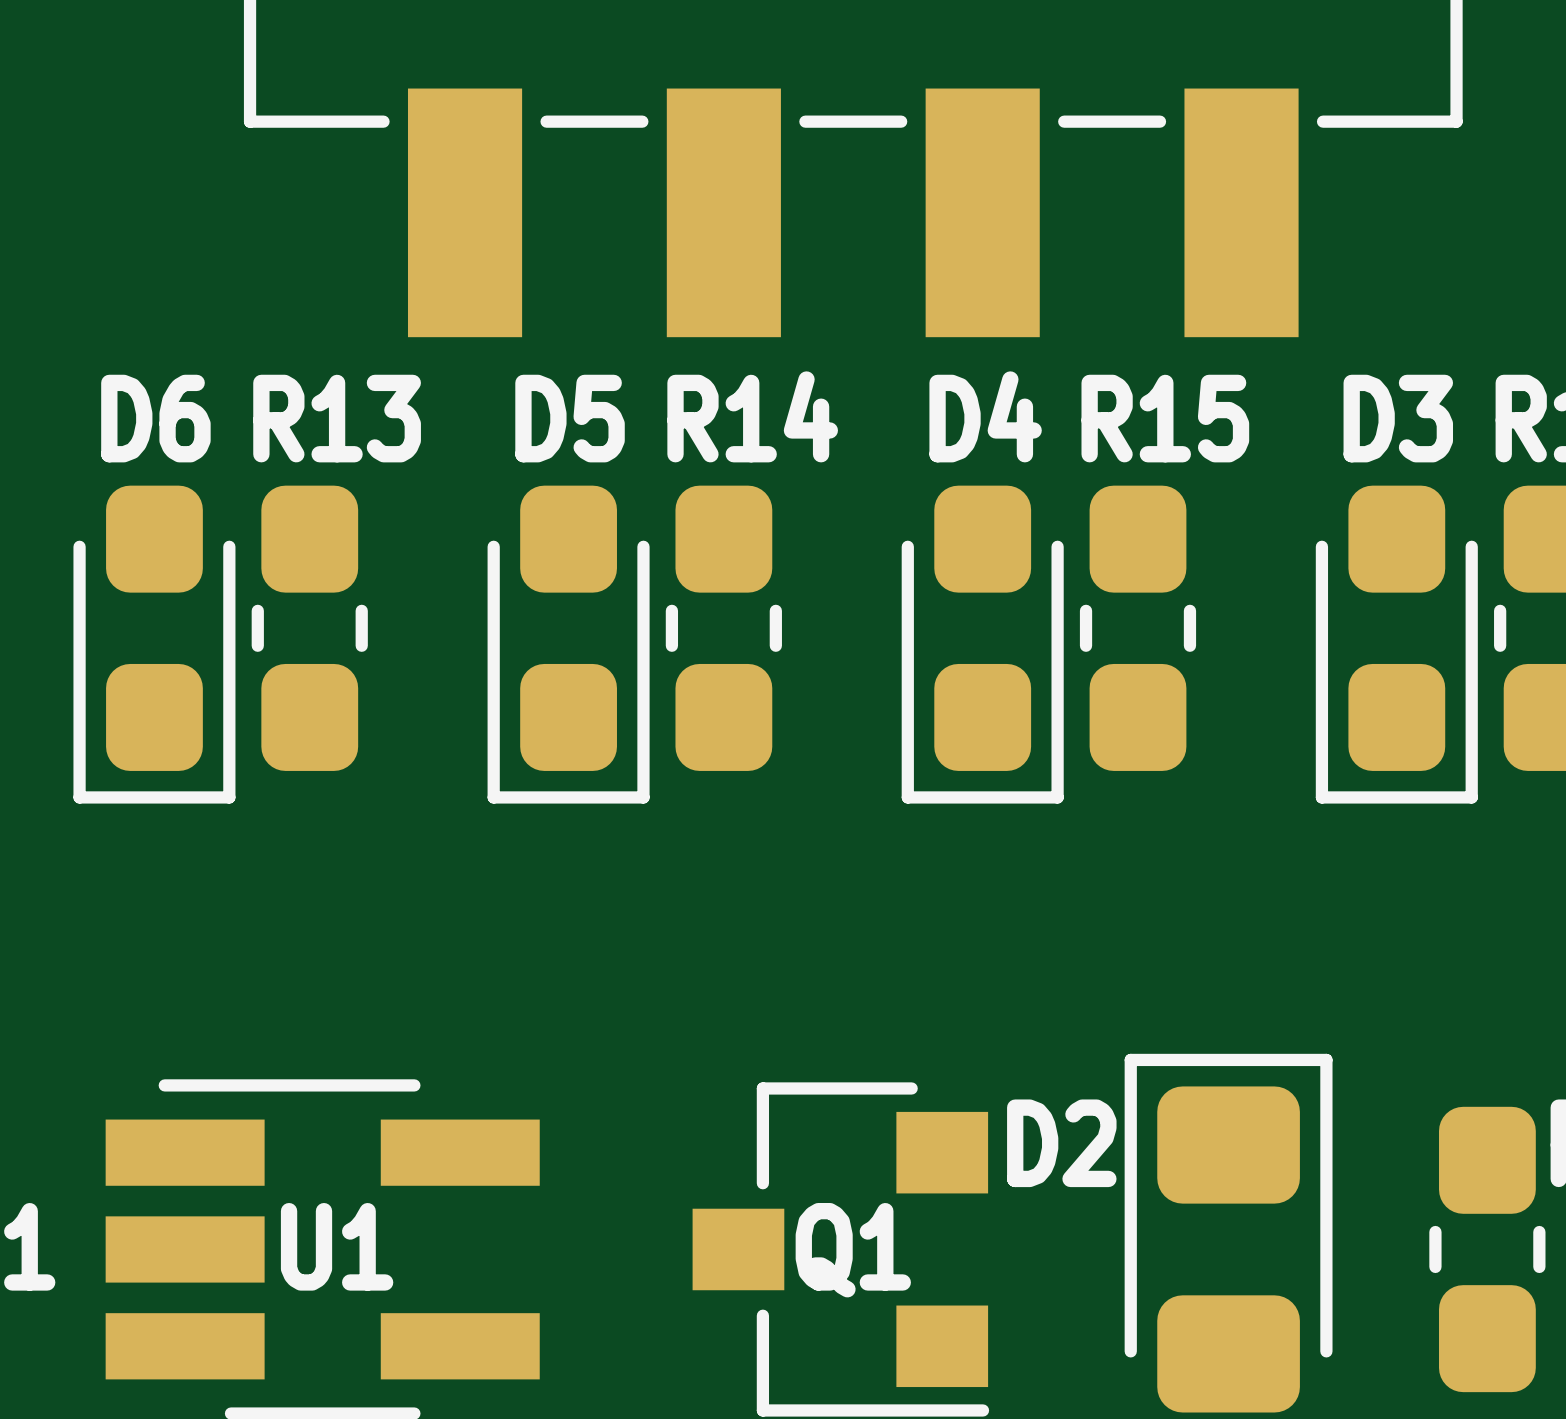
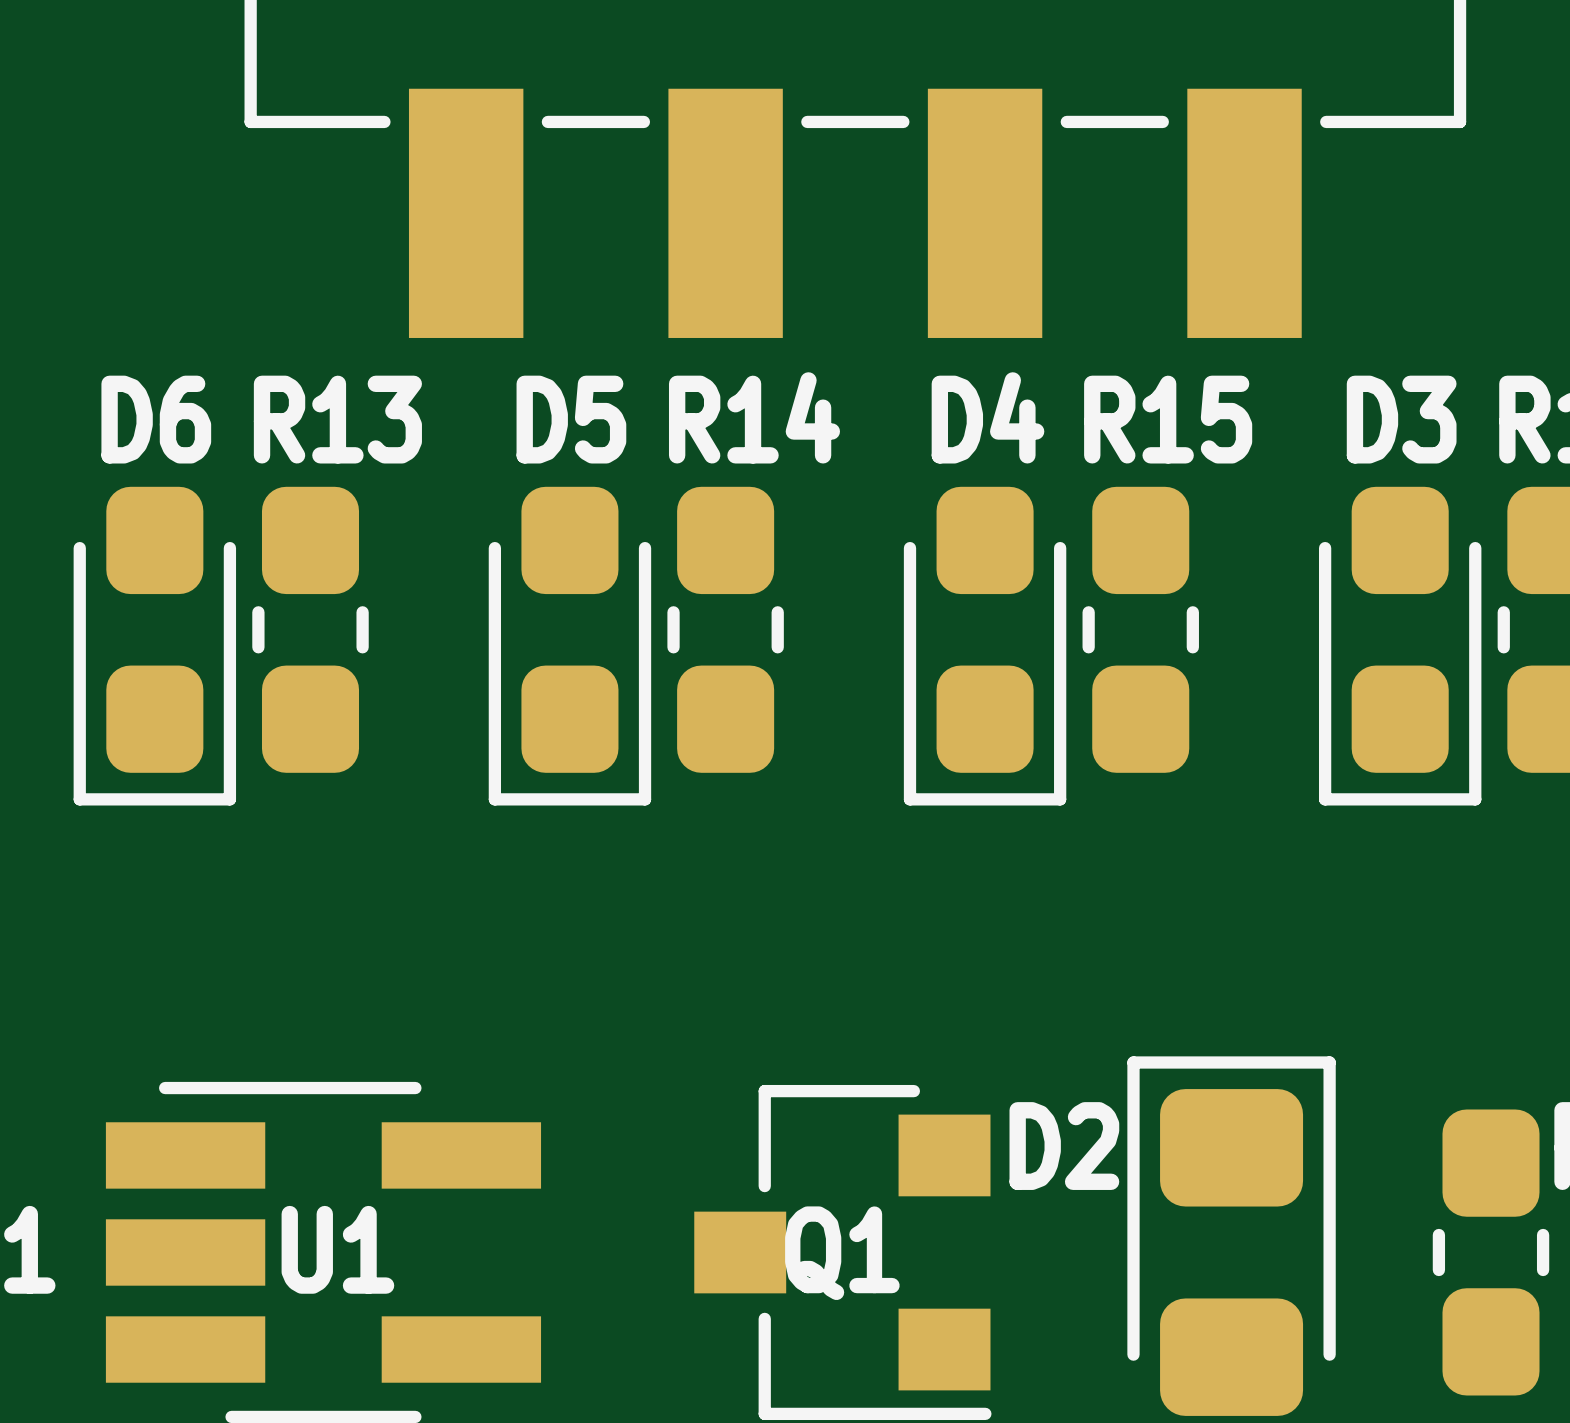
Q1 name position: Q1 (853, 1250) -> Q1 (842, 1253)

